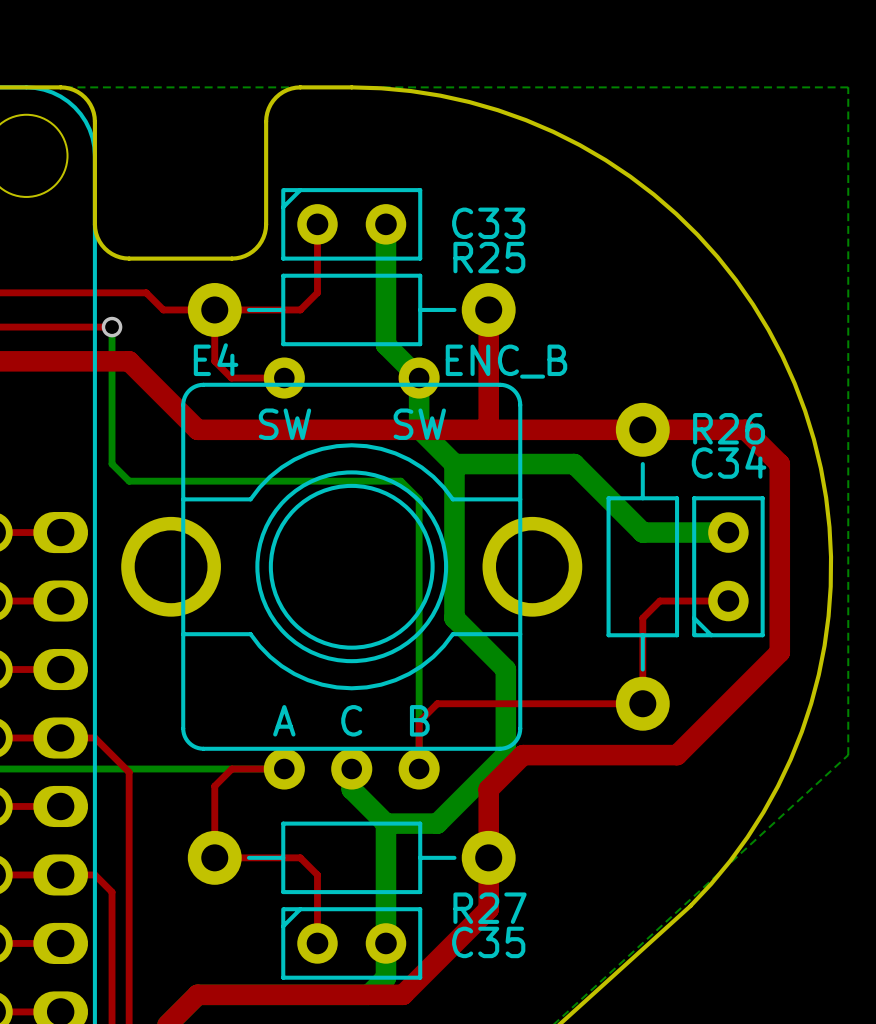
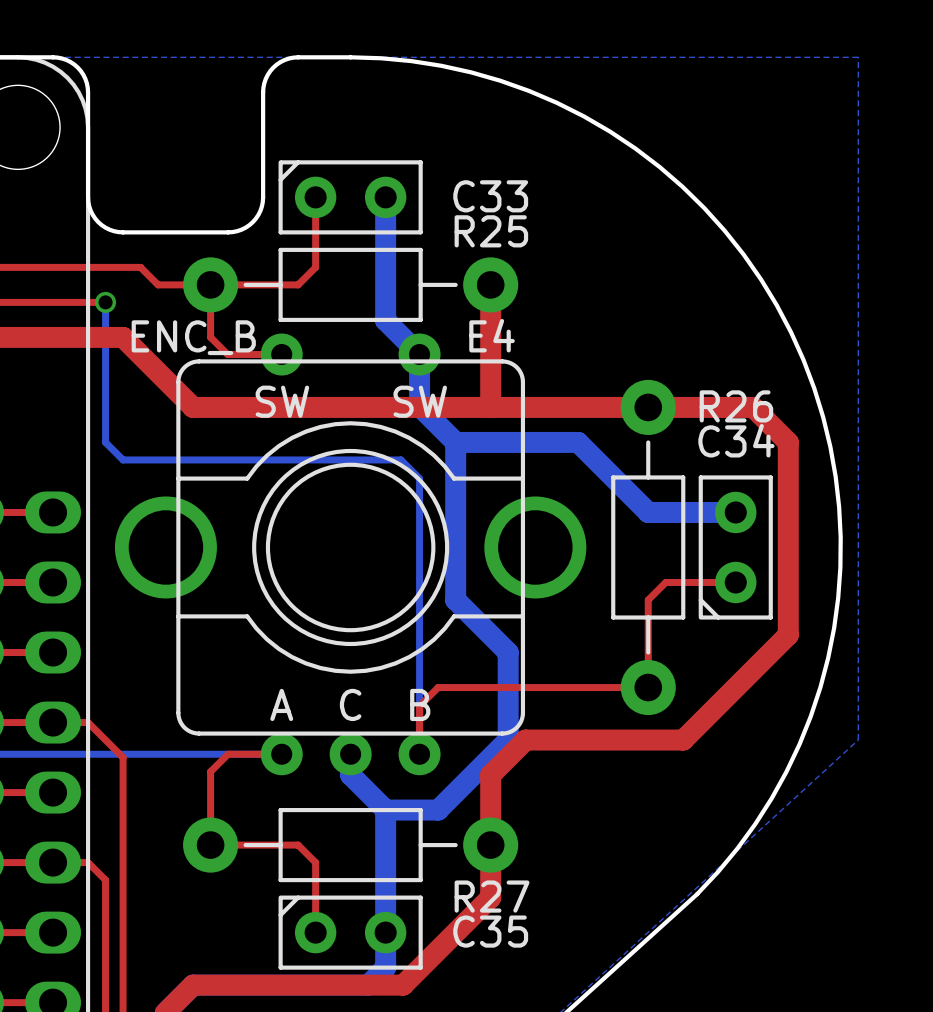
E4 name position: E4 (216, 359) -> E4 (492, 335)
E4 value position: ENC_B (506, 361) -> ENC_B (193, 337)

